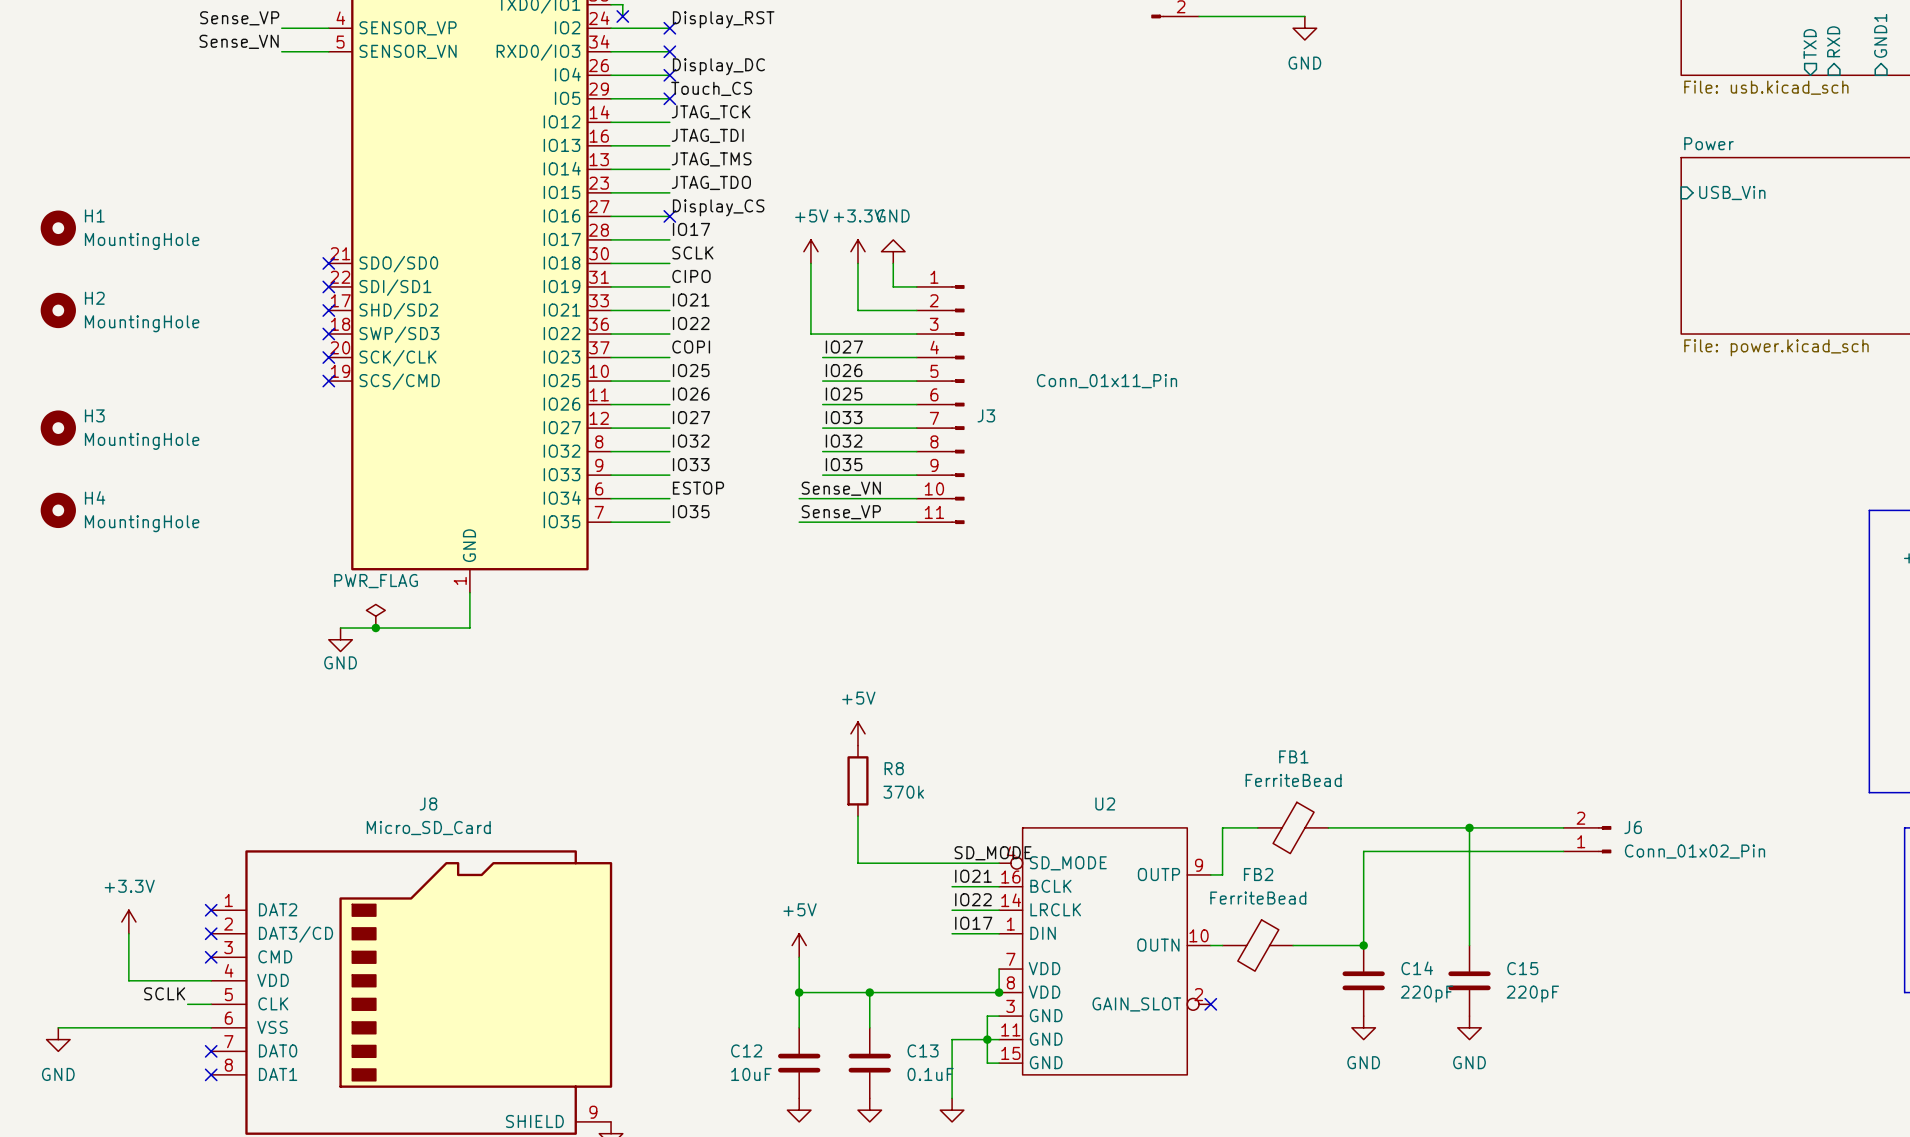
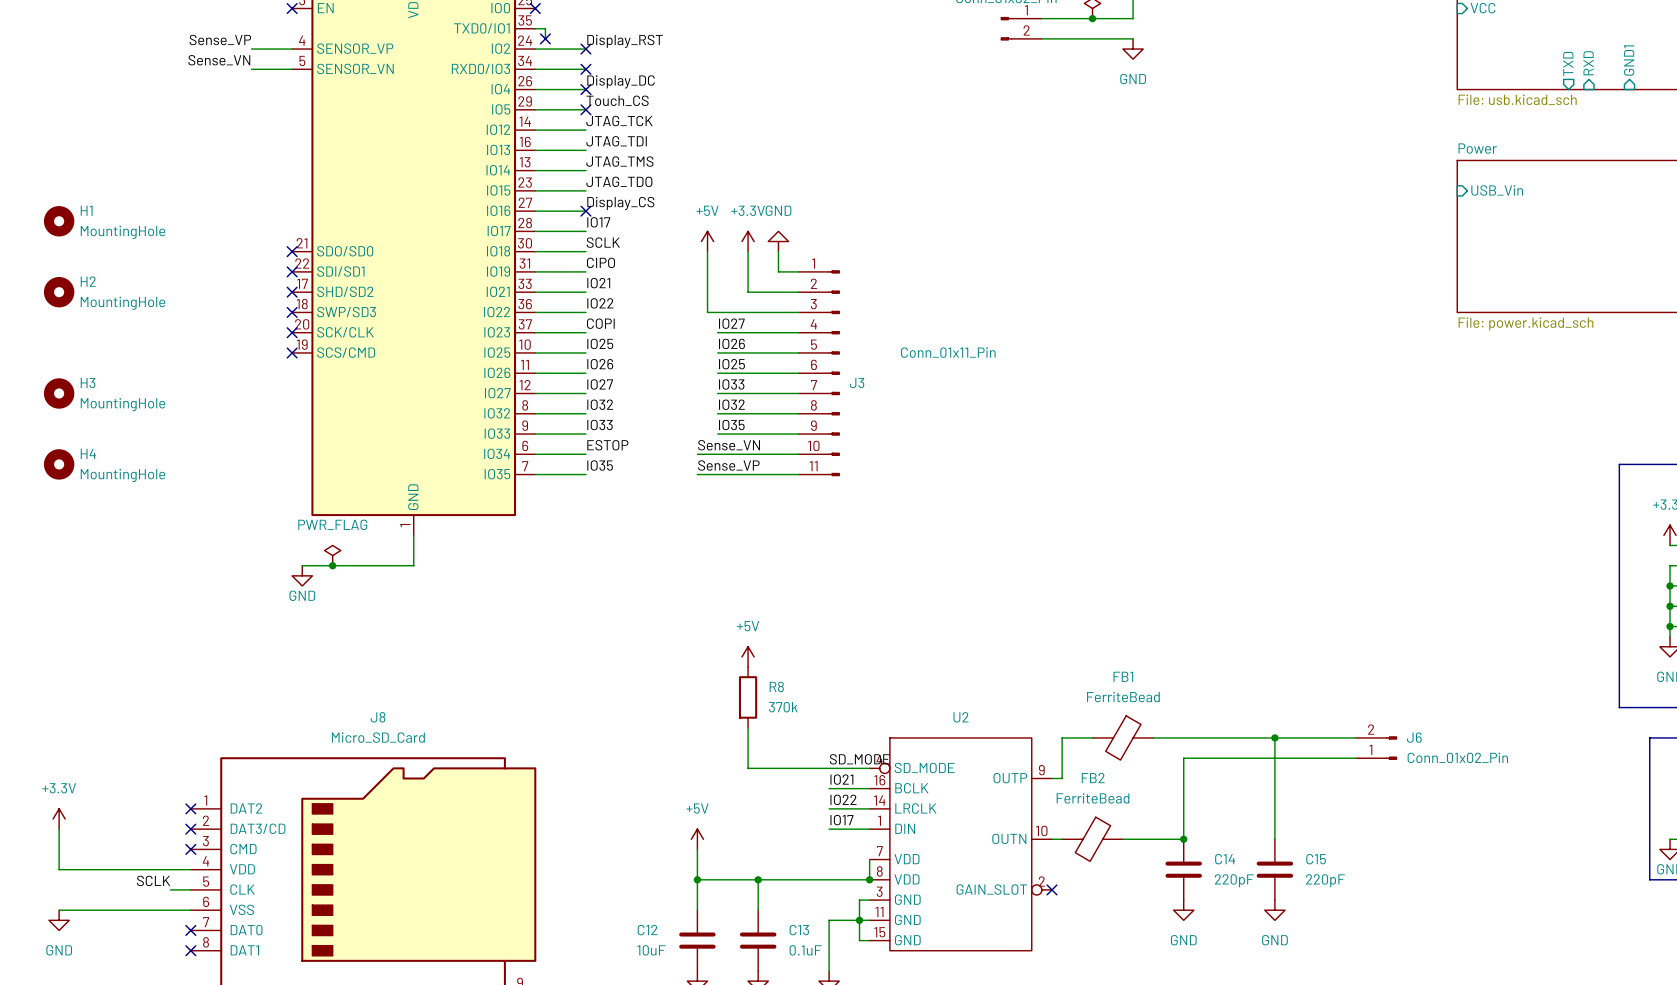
power symbol position: +3.3V (128, 922) -> +3.3V (59, 819)
wire: (128, 933) (128, 980) -> (59, 829) (59, 869) (119, 869)

